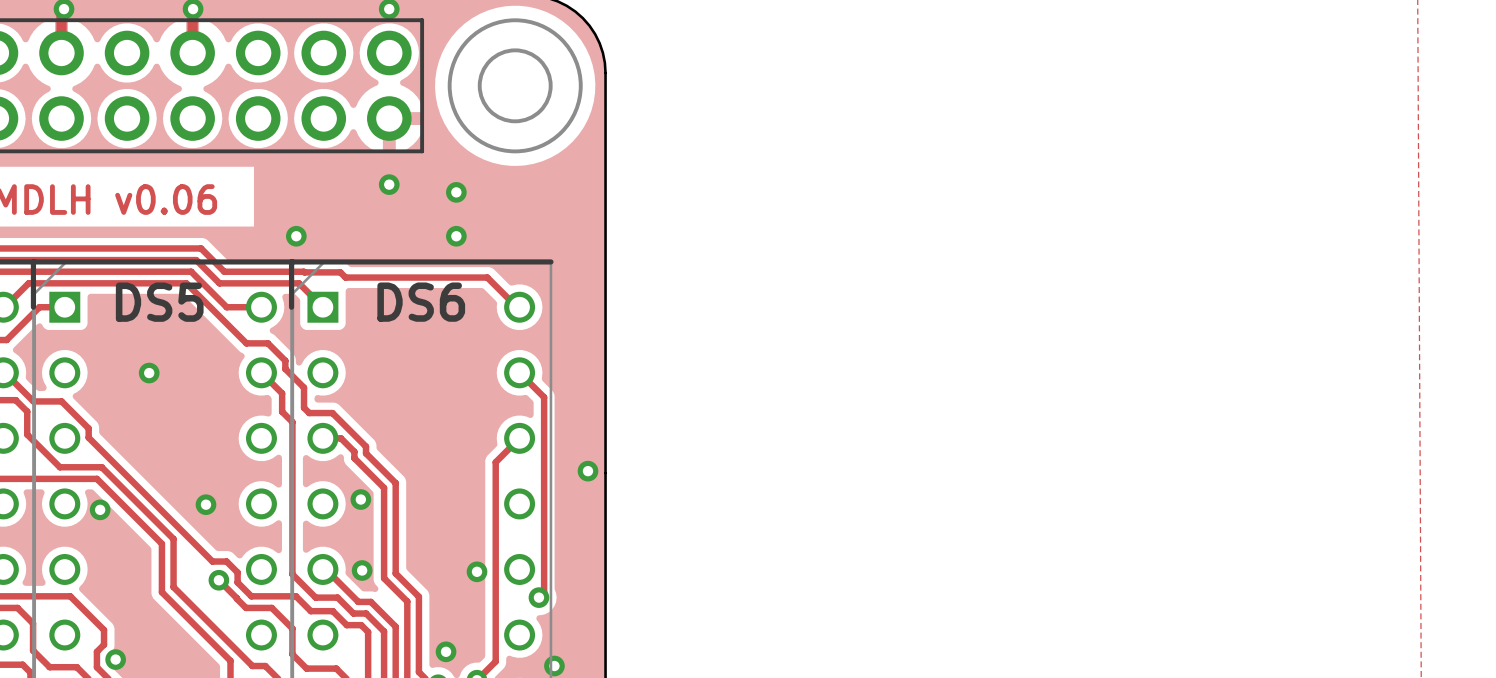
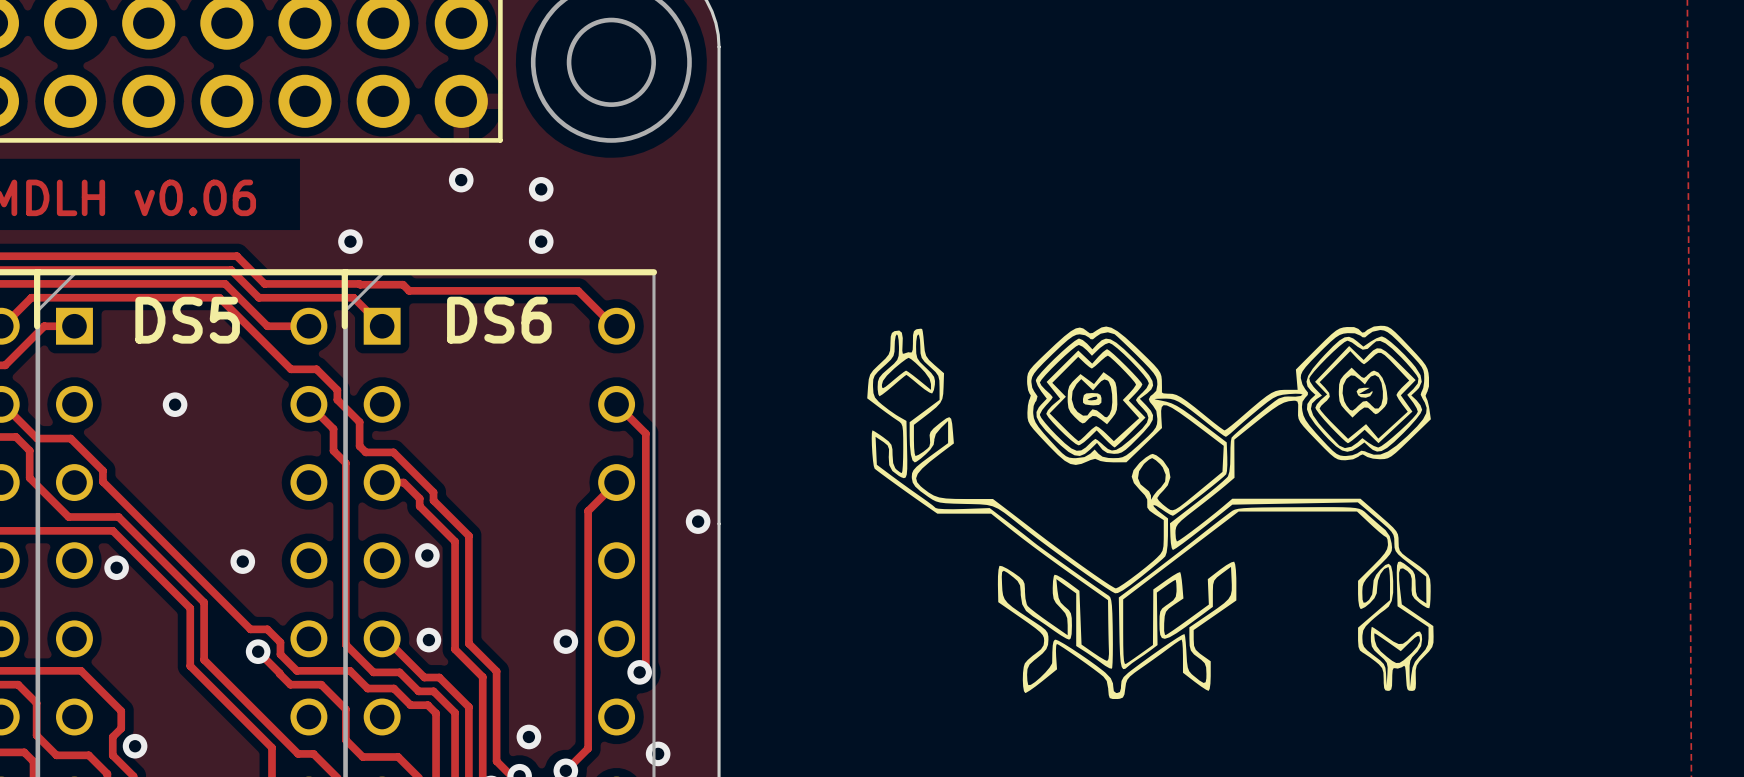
drawing: none -> [867, 325, 1434, 700]

